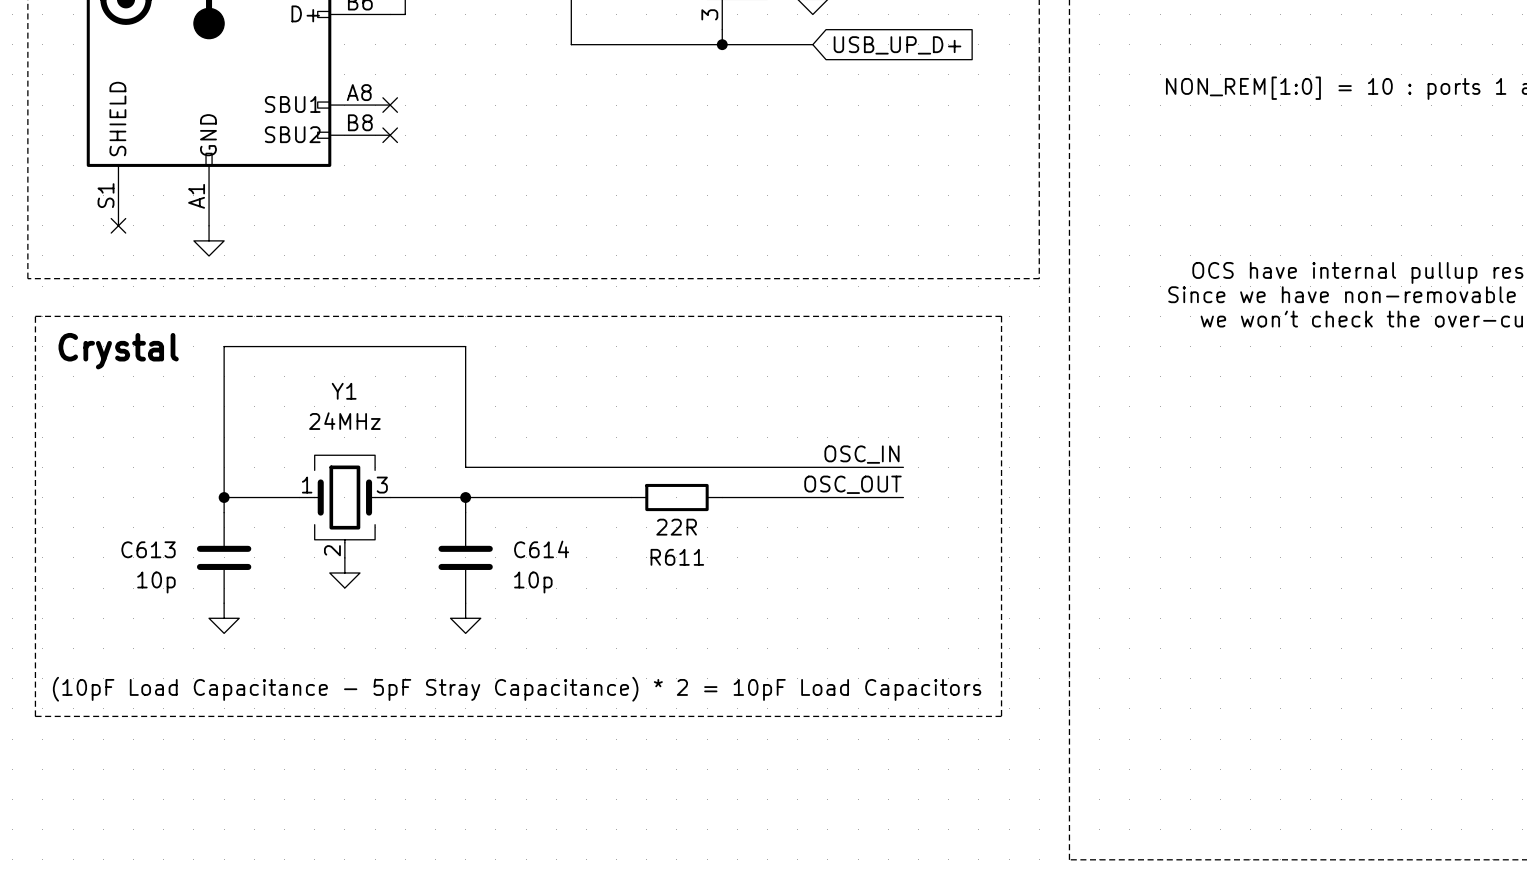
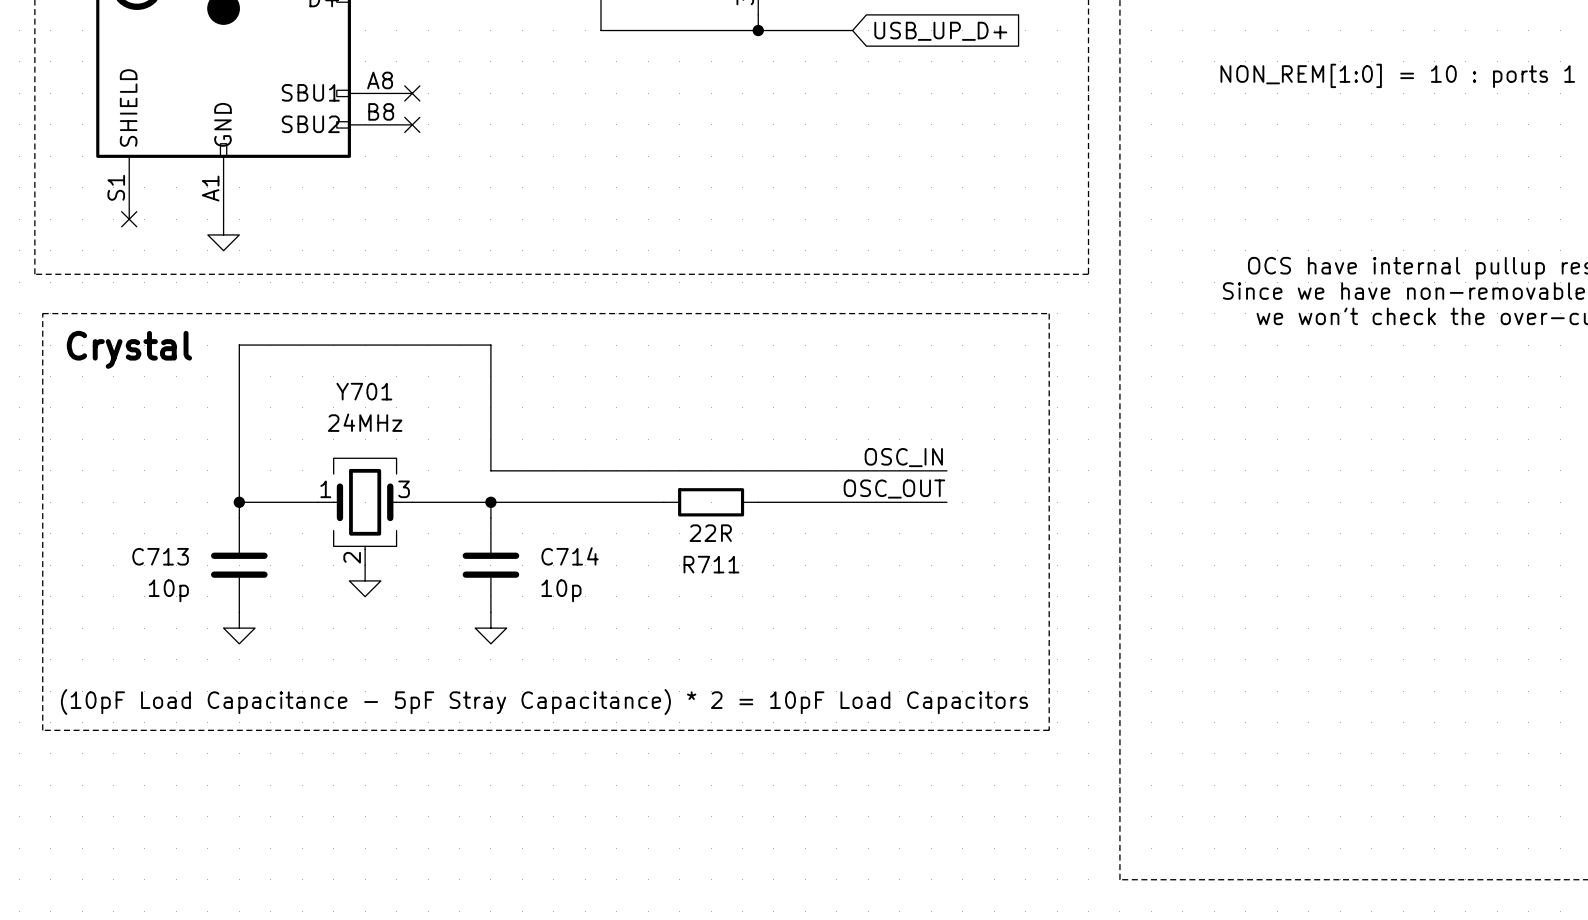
Y1 name: Y1 (344, 391) -> Y701 (364, 391)
C613 name: C613 (148, 549) -> C713 (160, 556)
C614 name: C614 (541, 549) -> C714 (570, 556)
R611 name: R611 (677, 557) -> R711 (711, 564)

